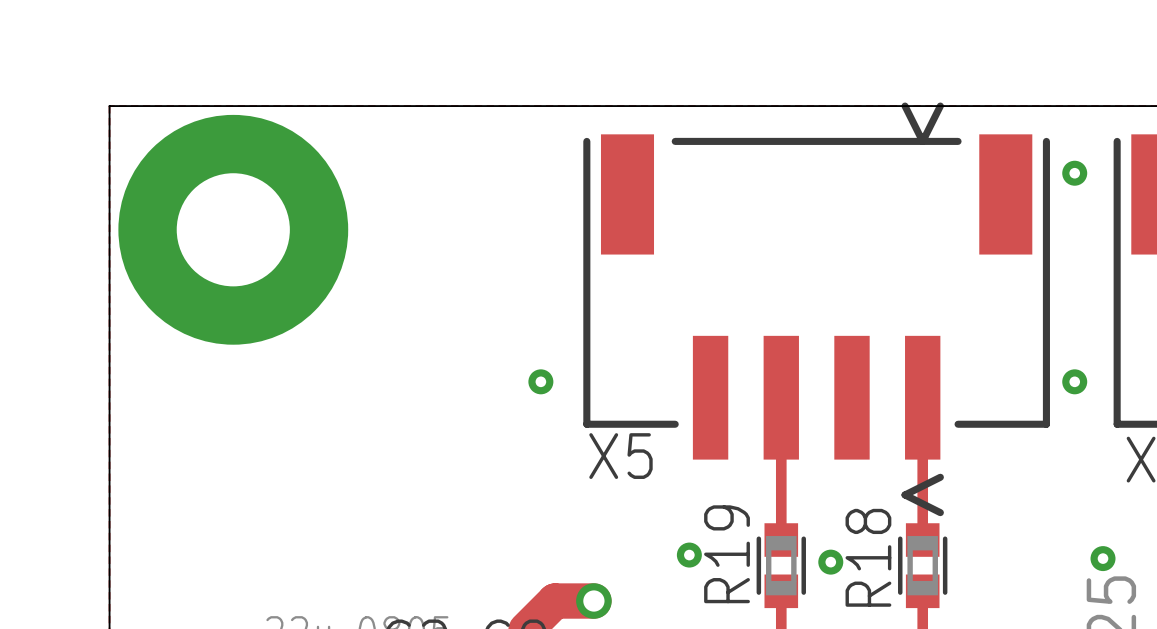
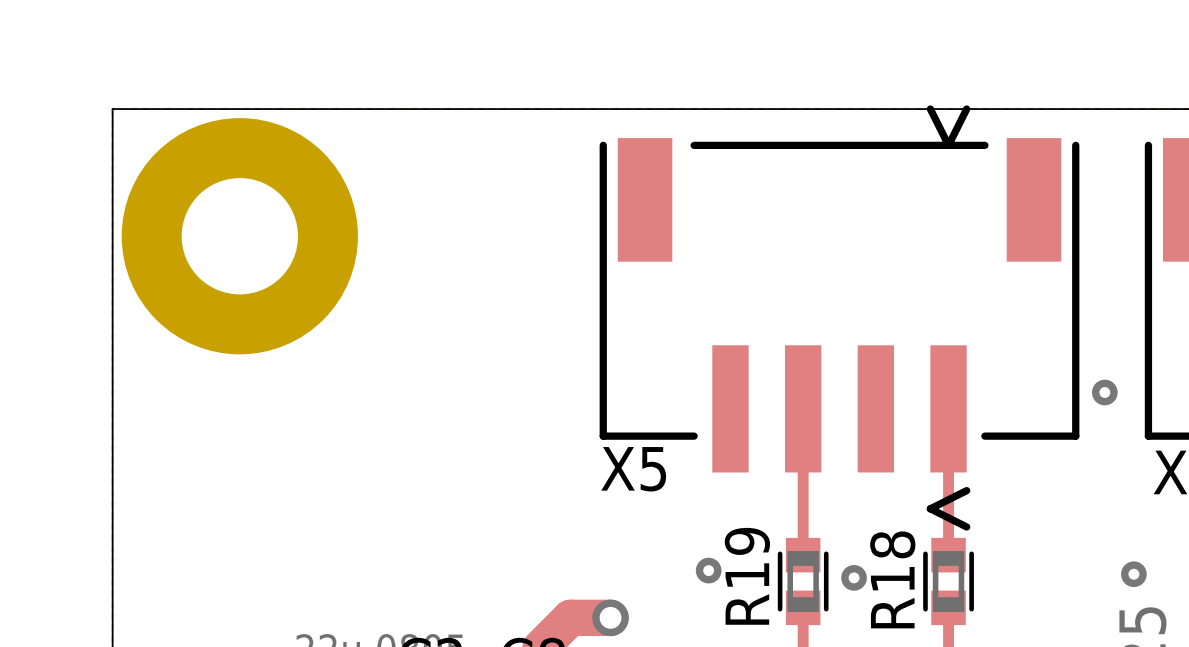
via: (1074, 173) -> none
via: (540, 381) -> none

